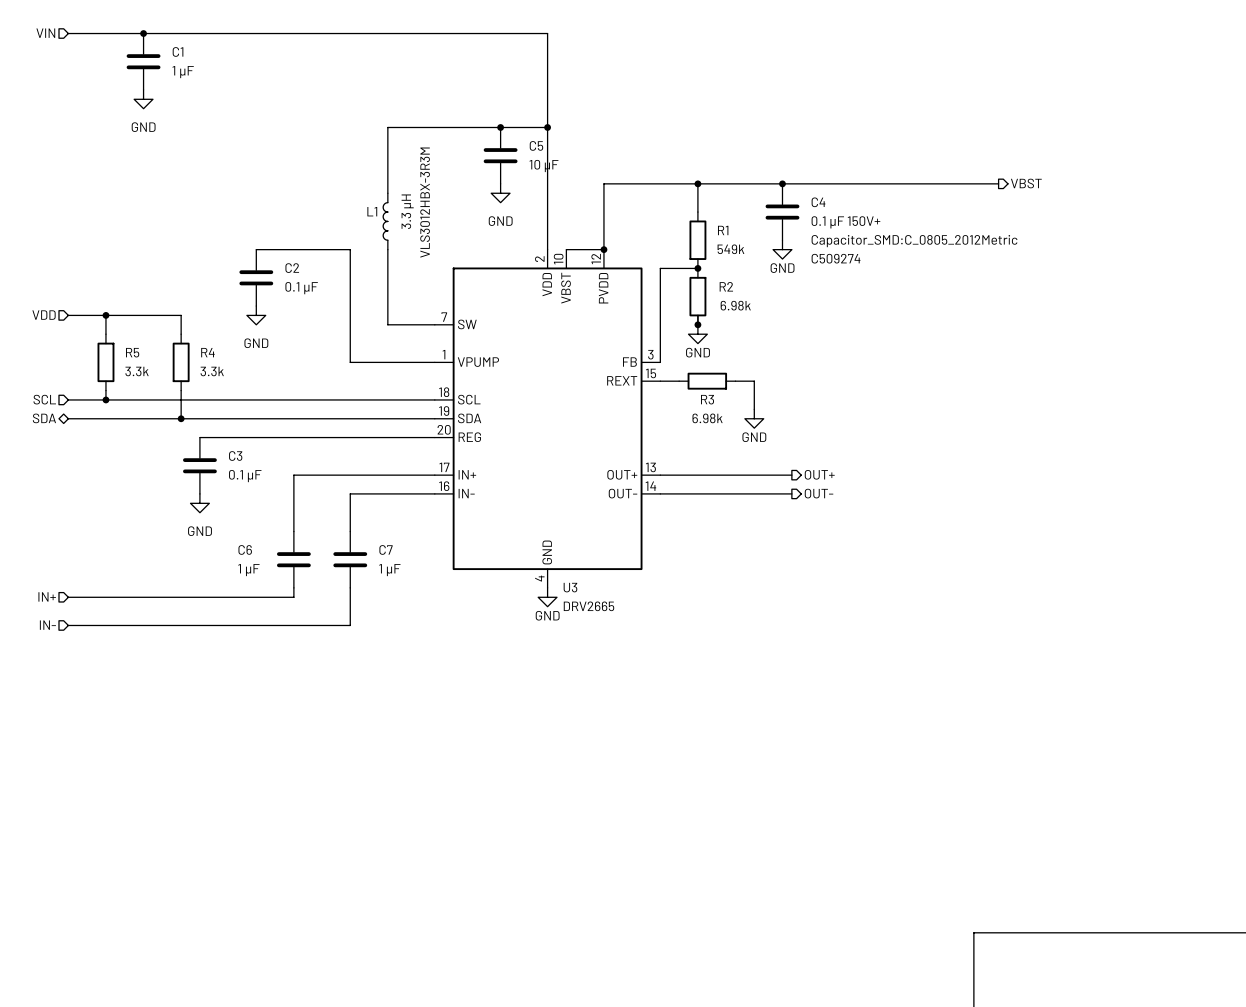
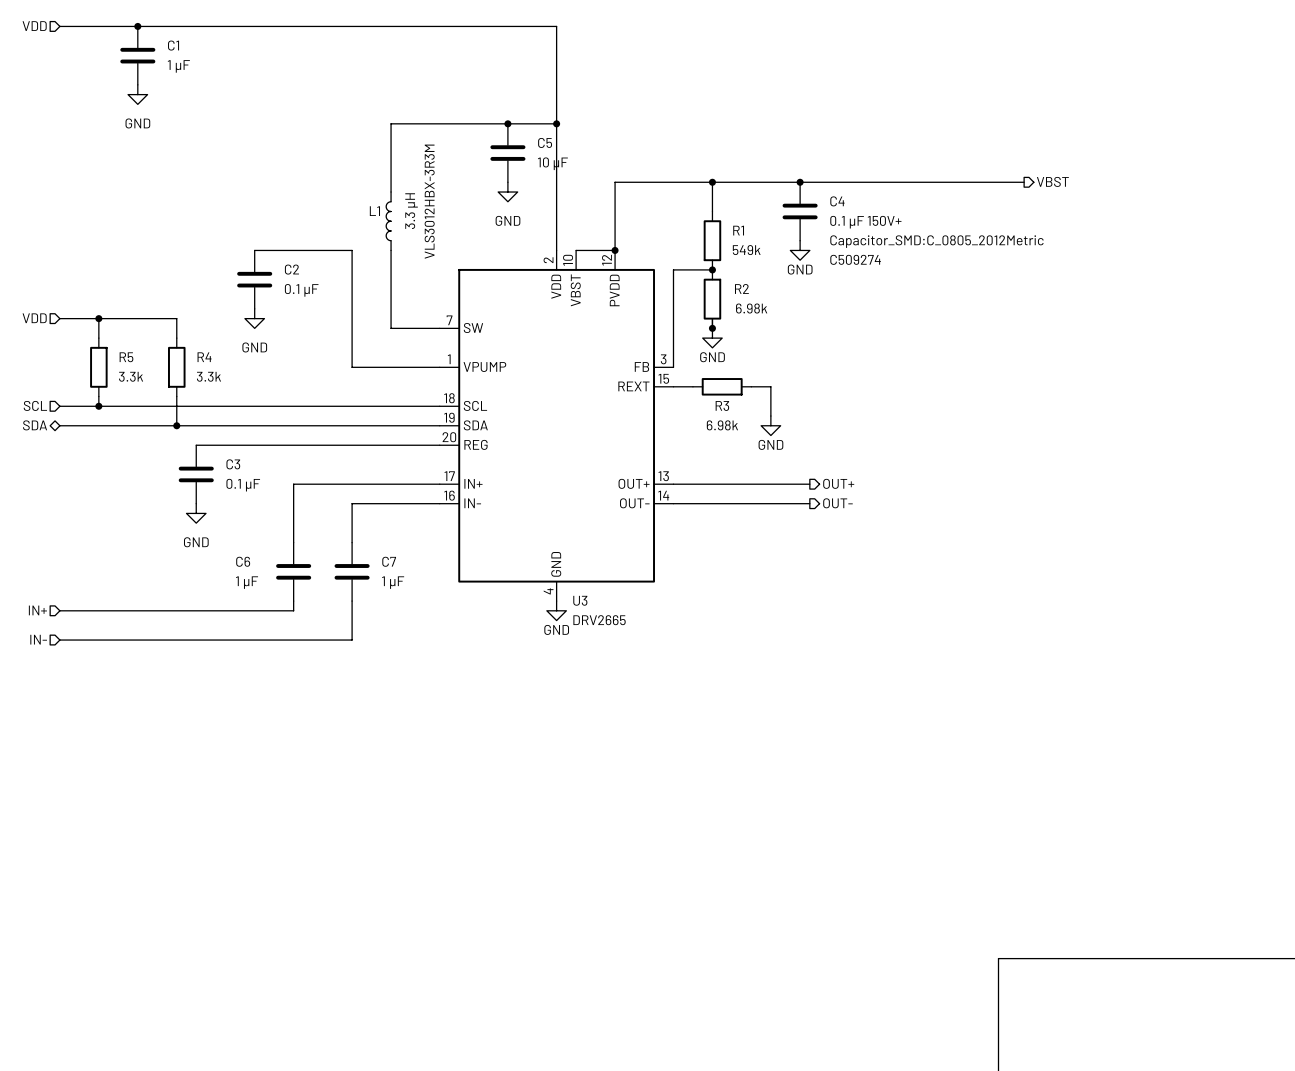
hierarchical label: VIN (45, 33) -> VDD (34, 26)

